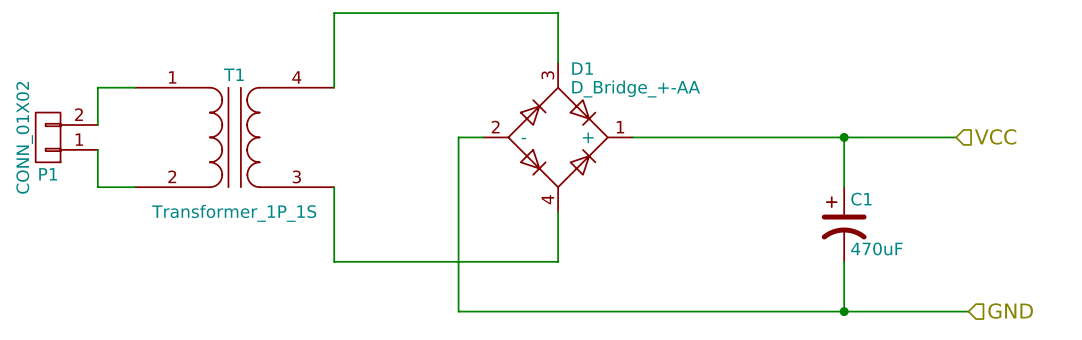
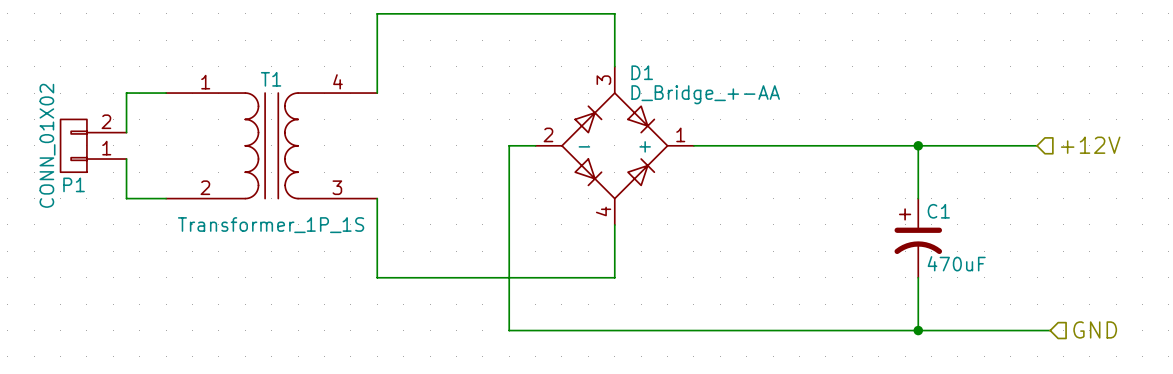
hierarchical label: VCC (995, 136) -> +12V (1090, 145)

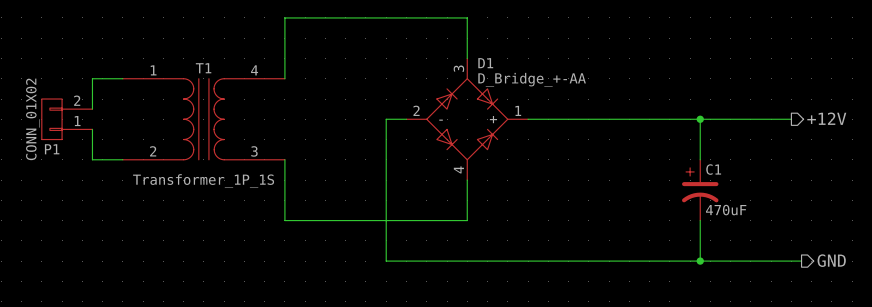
hierarchical label shape: input (1090, 145) -> output (826, 118)
hierarchical label shape: input (1095, 329) -> output (831, 260)

